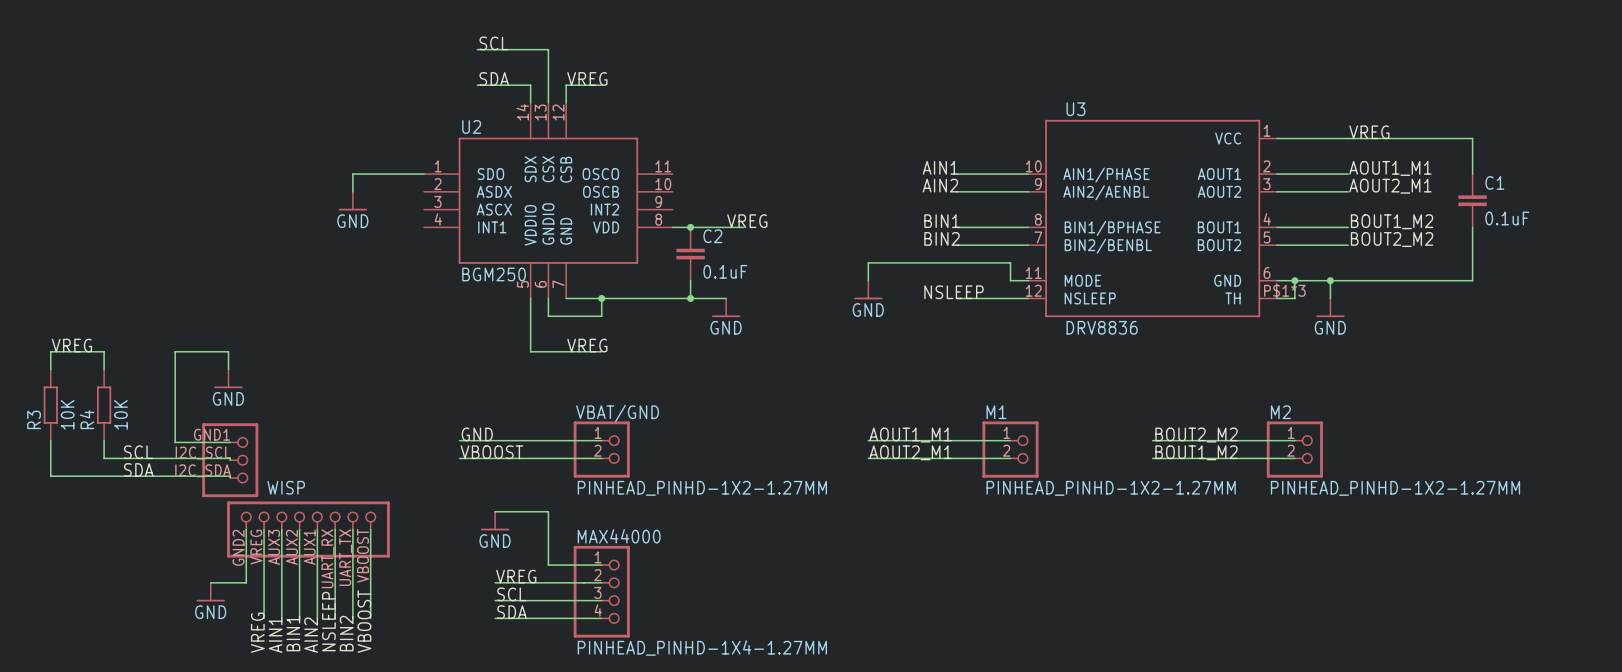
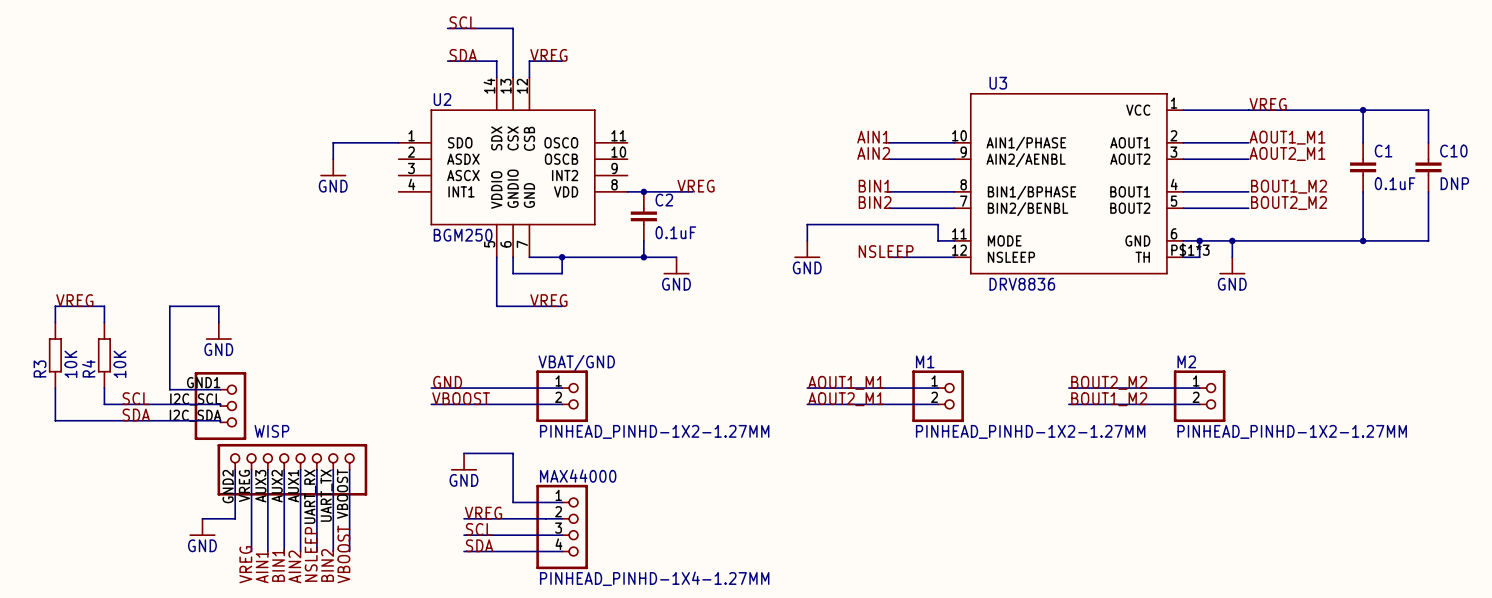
wire: none -> (1363, 110) (1428, 110) (1428, 142)
junction: none -> (1363, 110)
C10: none -> DNP (1428, 167)
wire: none -> (1428, 191) (1428, 240) (1363, 240)
junction: none -> (1363, 240)

